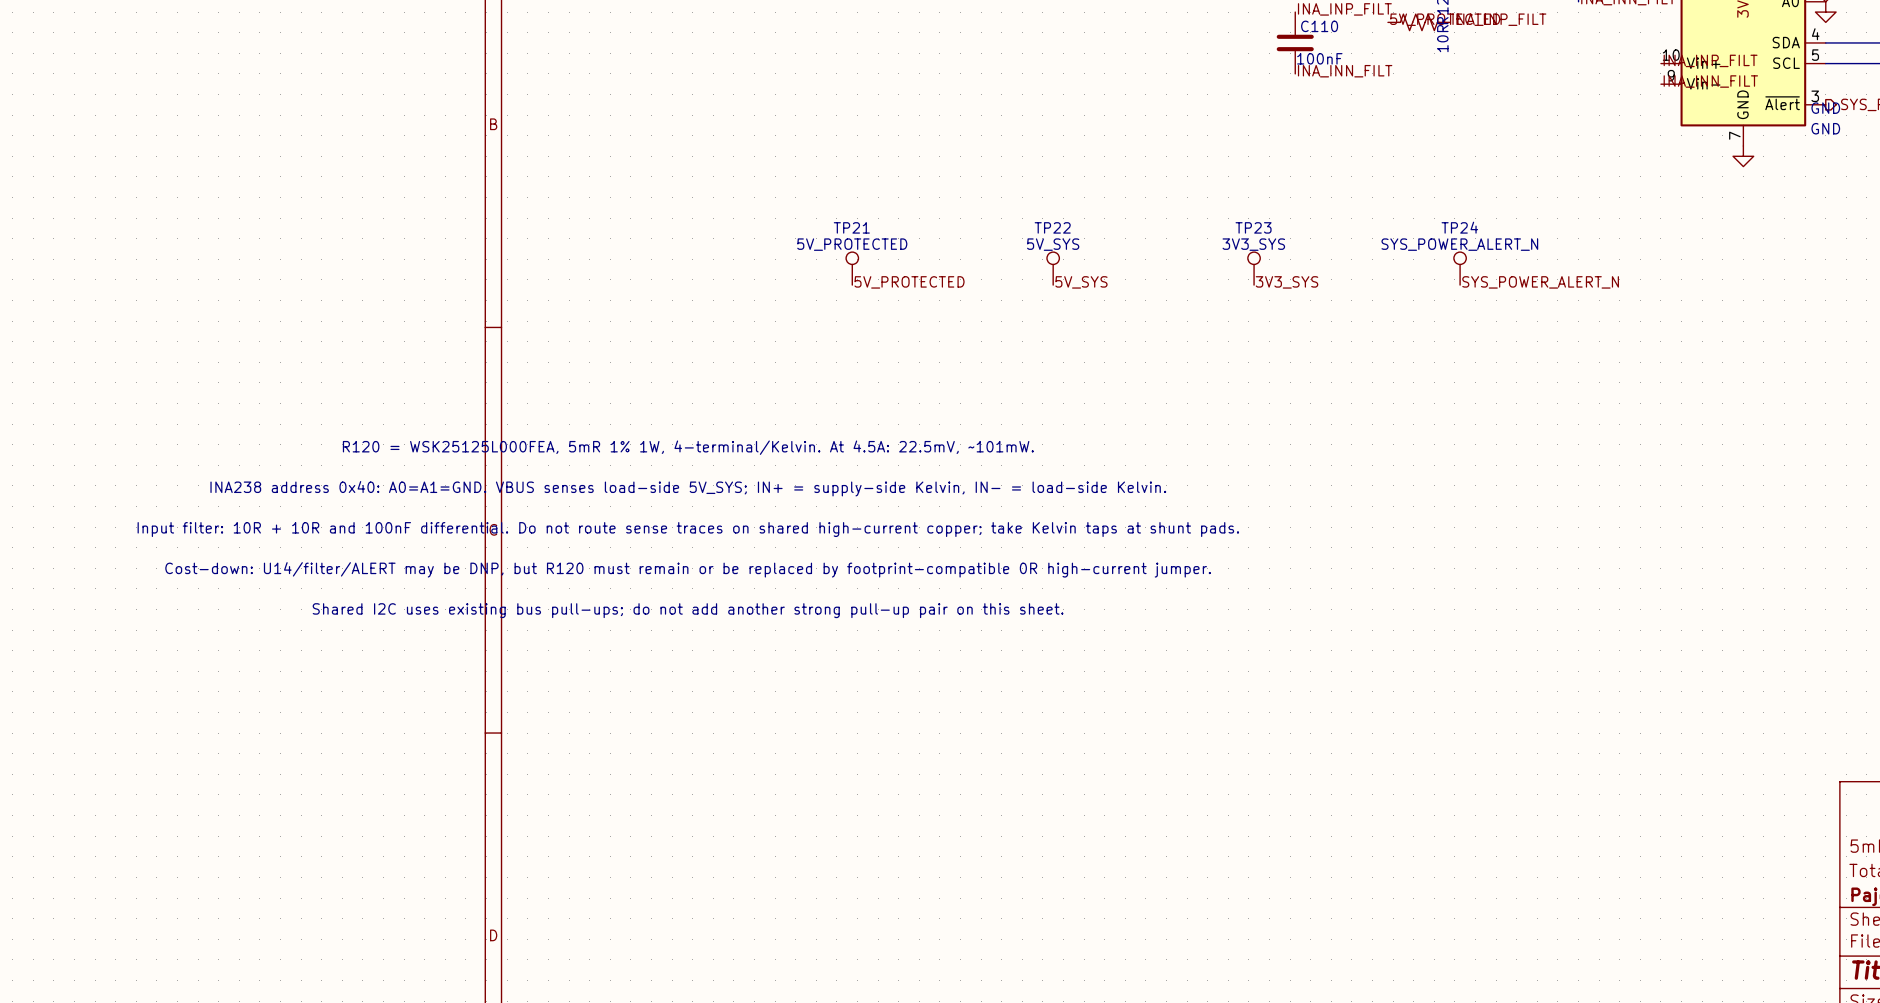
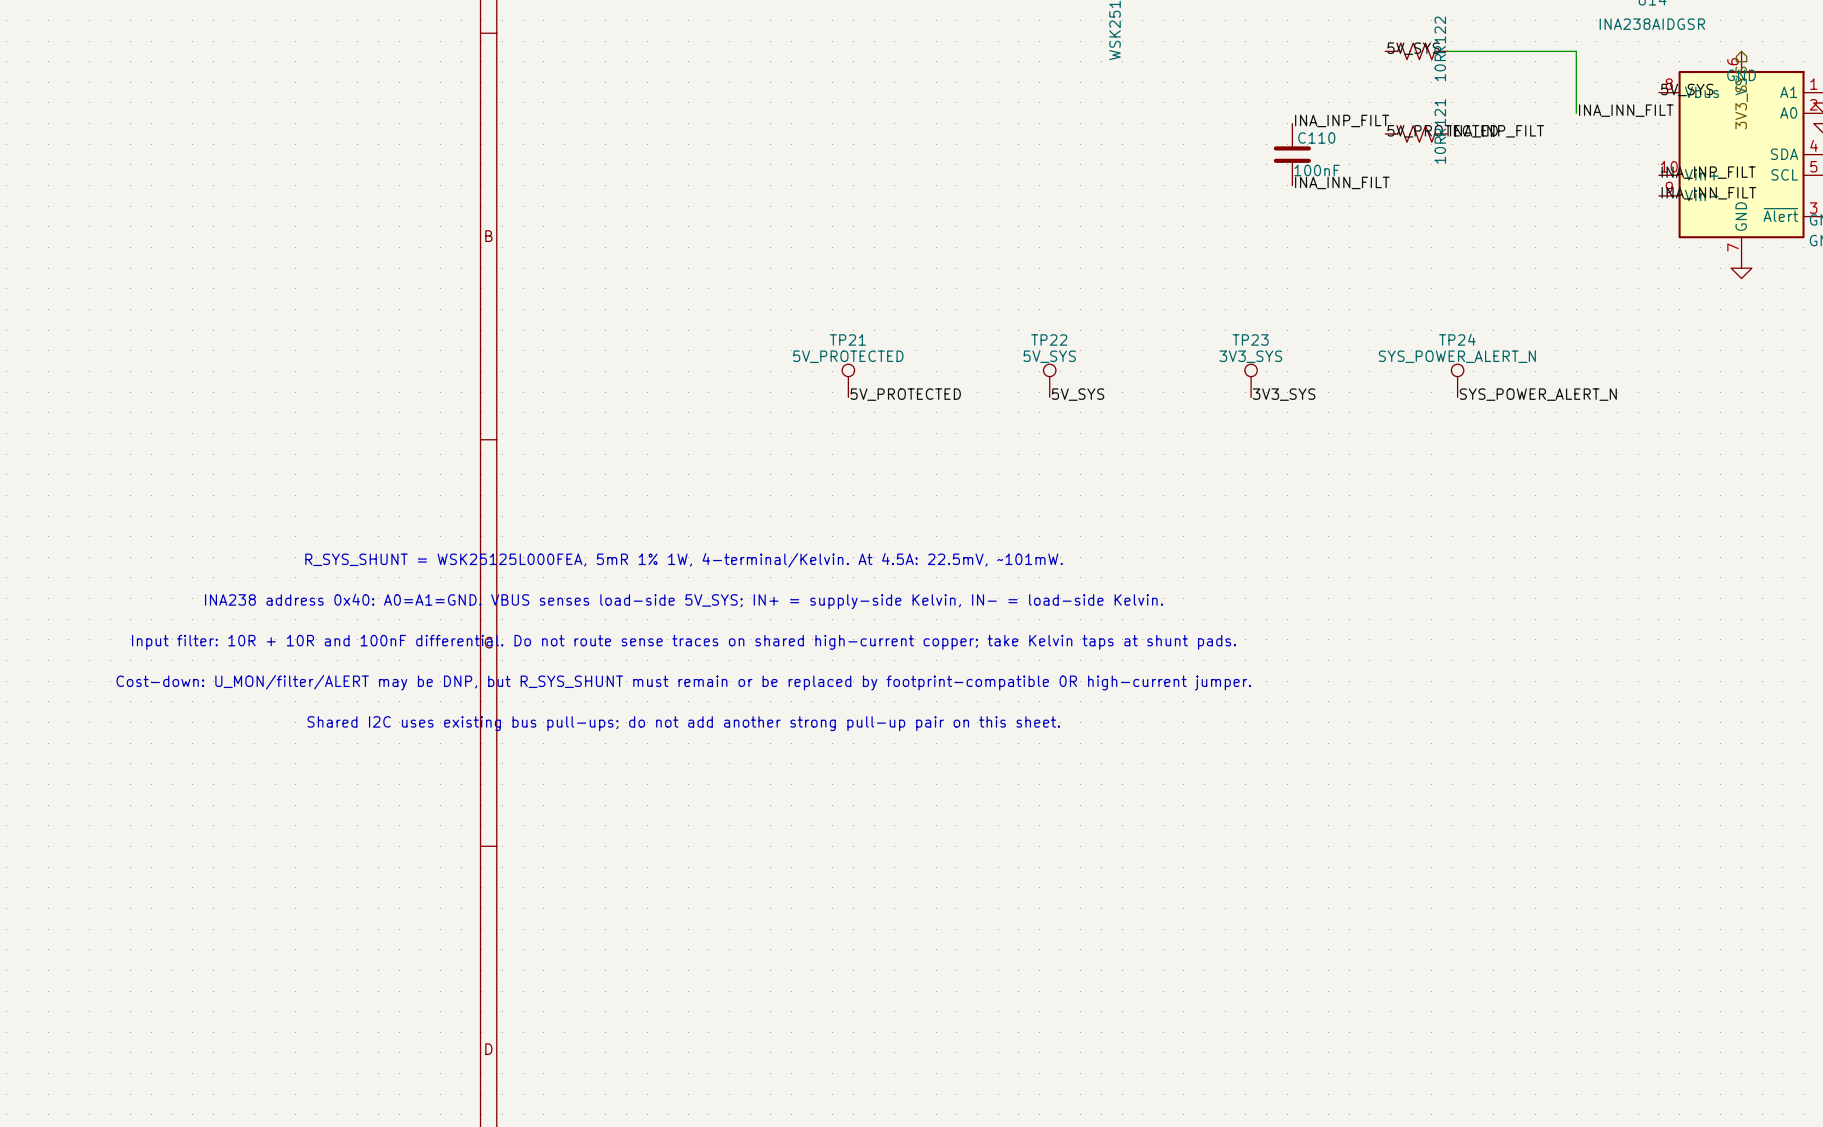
text: R120 = WSK25125L000FEA, 5mR 1% 1W, 4-terminal/Kelvin. At 4.5A: 22.5mV, ~101mW. (688, 447) -> R_SYS_SHUNT = WSK25125L000FEA, 5mR 1% 1W, 4-terminal/Kelvin. At 4.5A: 22.5mV, ~101mW. (684, 560)
text: Cost-down: U14/filter/ALERT may be DNP, but R120 must remain or be replaced by footprint-compatible 0R high-current jumper. (688, 569) -> Cost-down: U_MON/filter/ALERT may be DNP, but R_SYS_SHUNT must remain or be replaced by footprint-compatible 0R high-current jumper. (683, 682)

